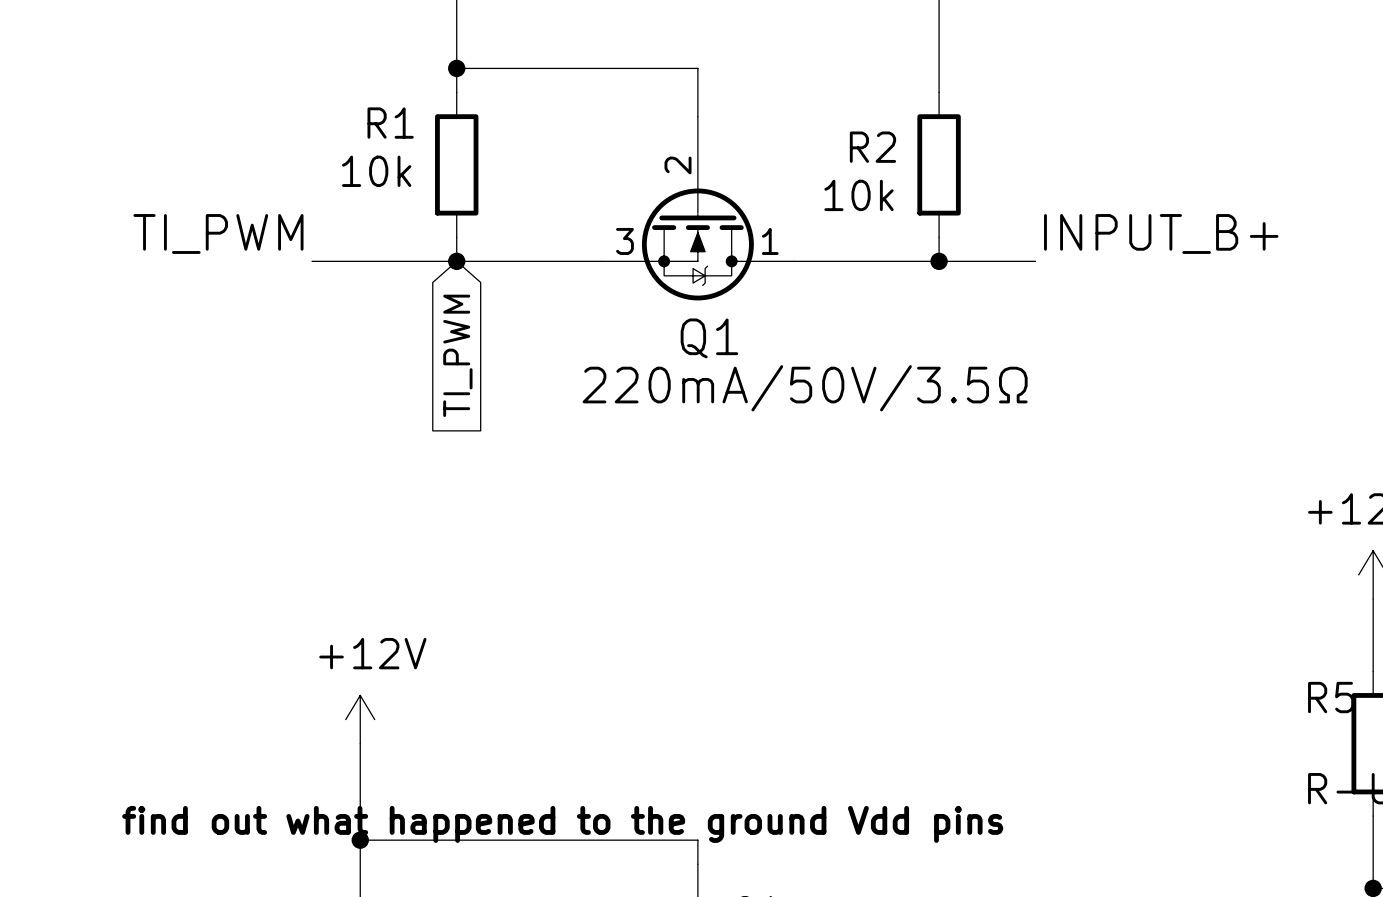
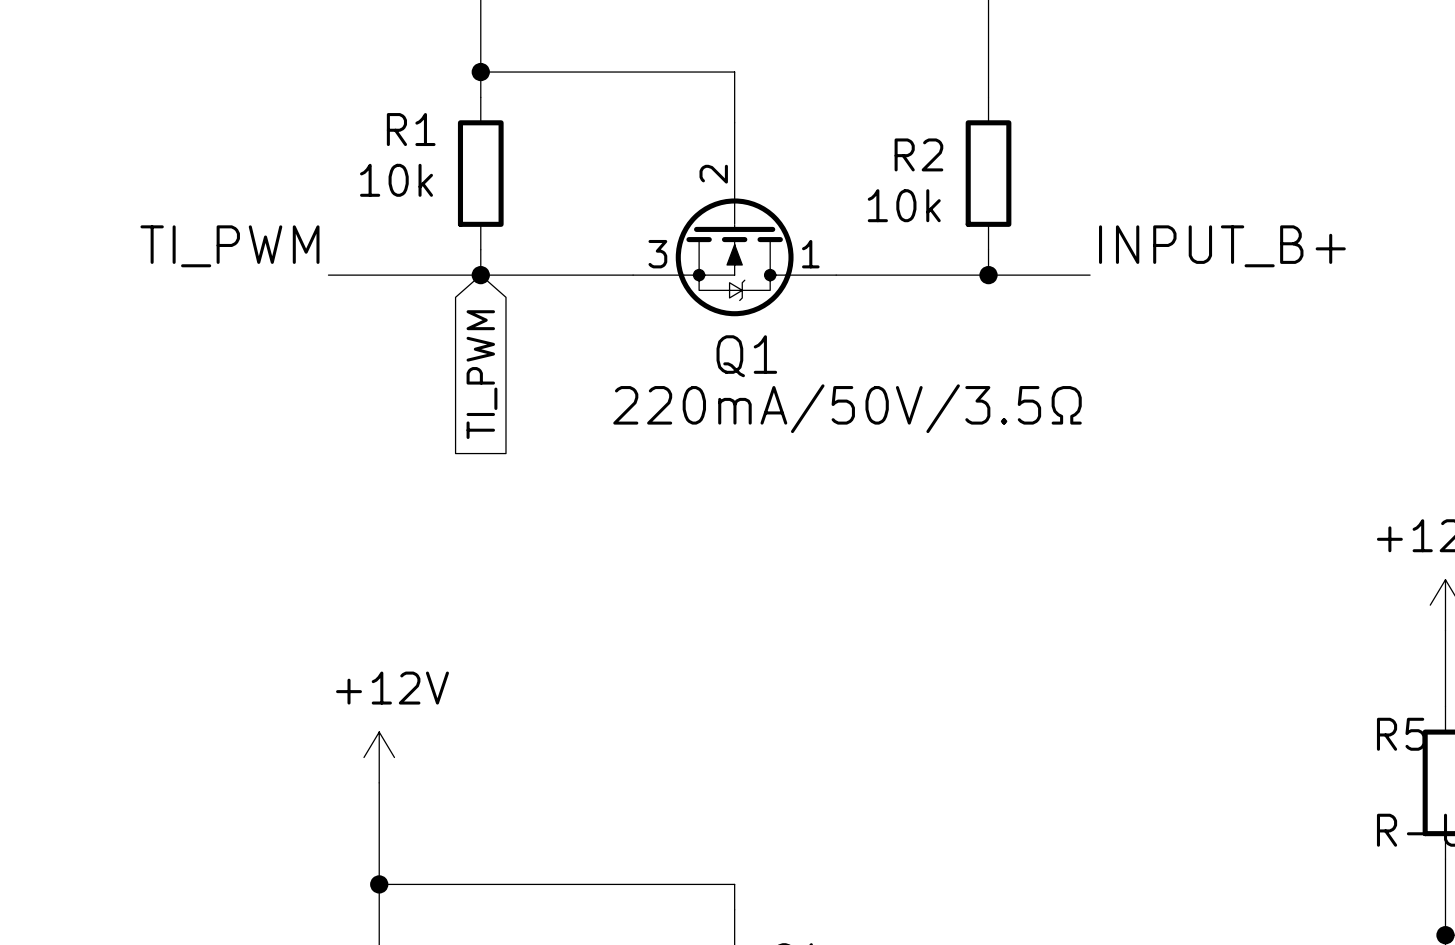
text: find out what happened to the ground Vdd pins (562, 824) -> none

